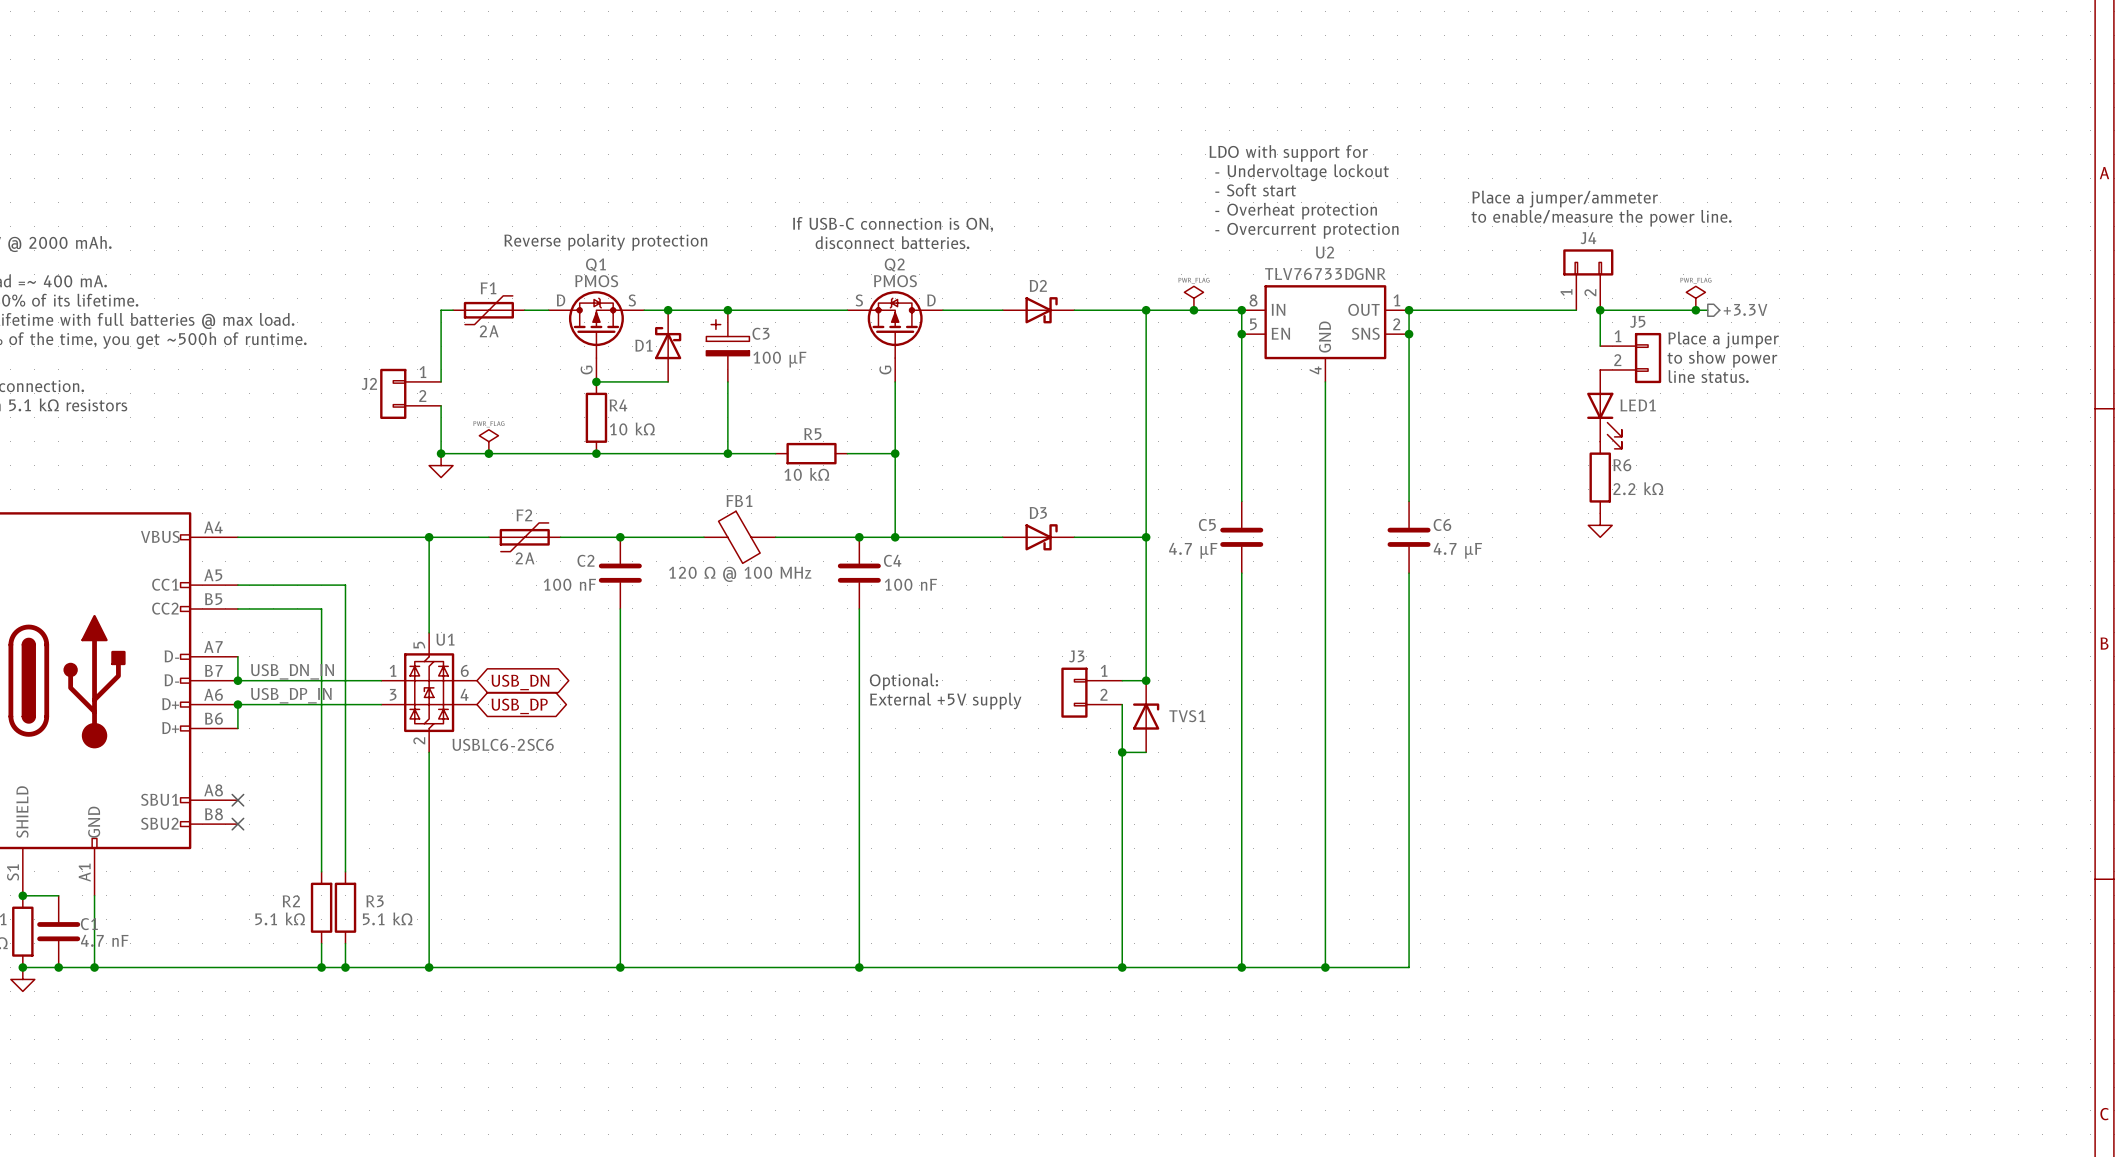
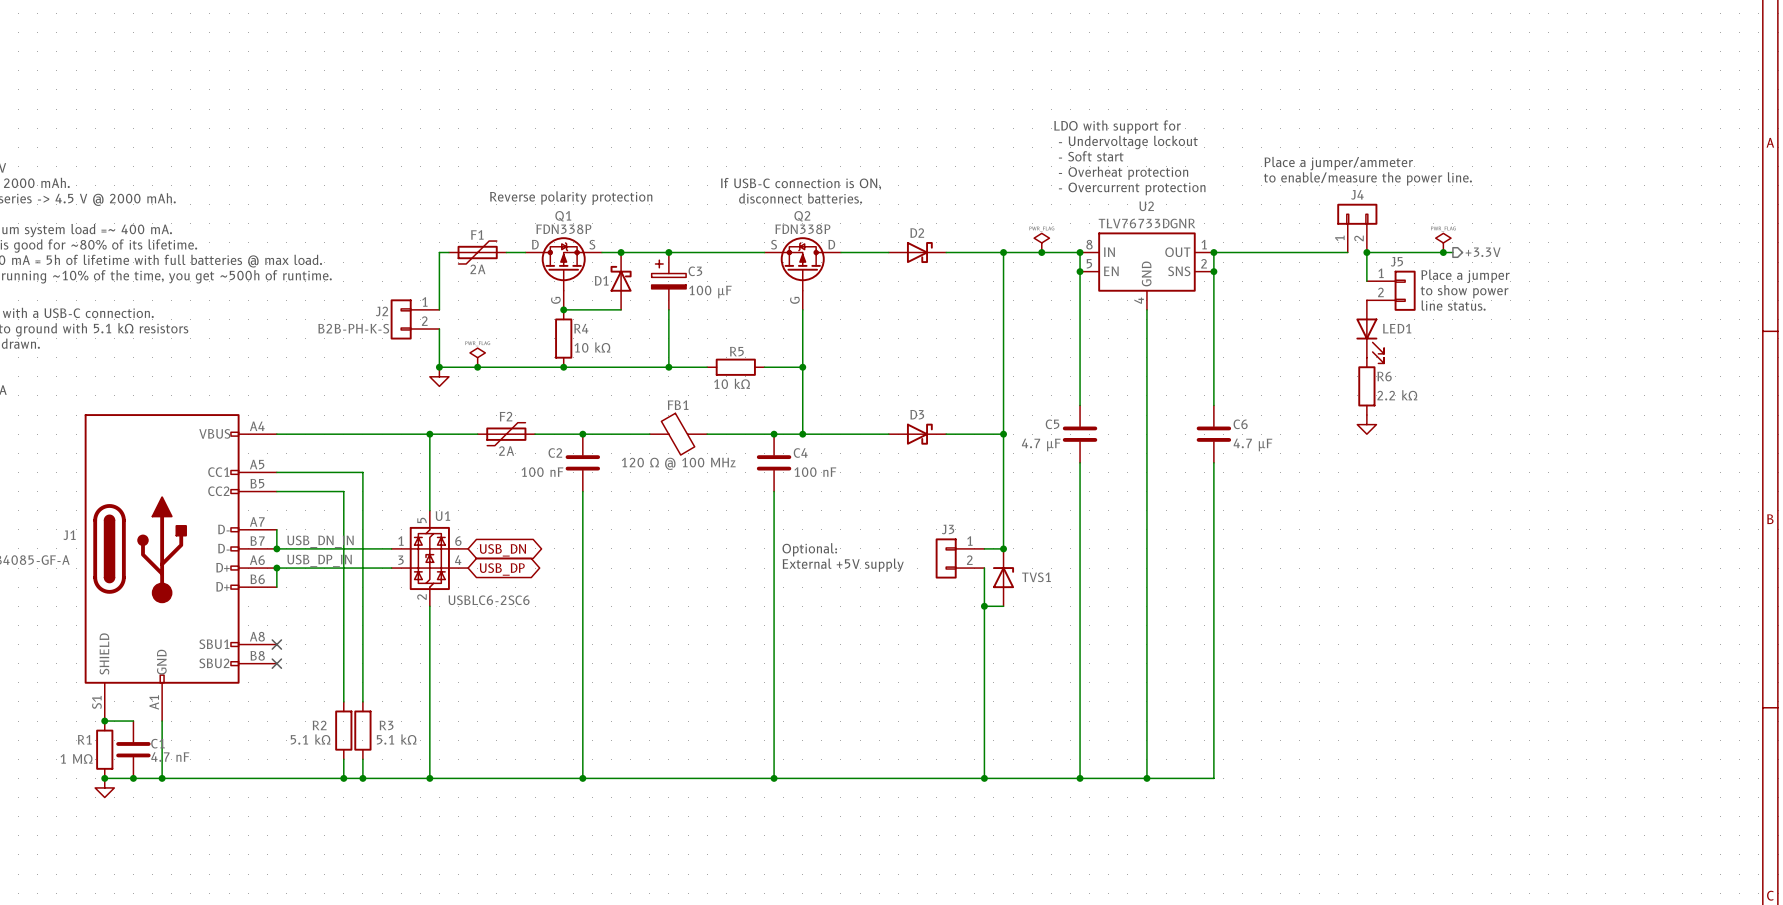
Q1 value: PMOS (596, 281) -> FDN338P (563, 229)
Q2 value: PMOS (895, 281) -> FDN338P (802, 229)
J2 value: none -> B2B-PH-K-S (353, 328)

